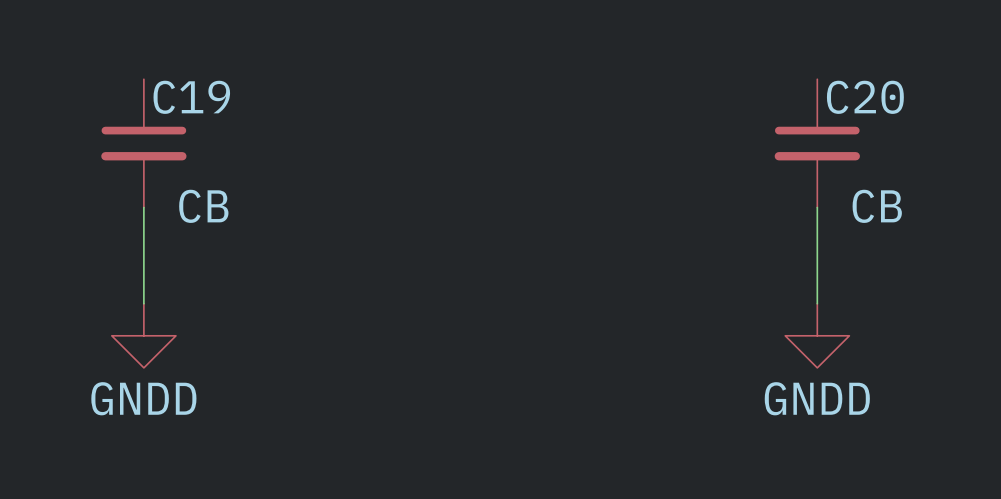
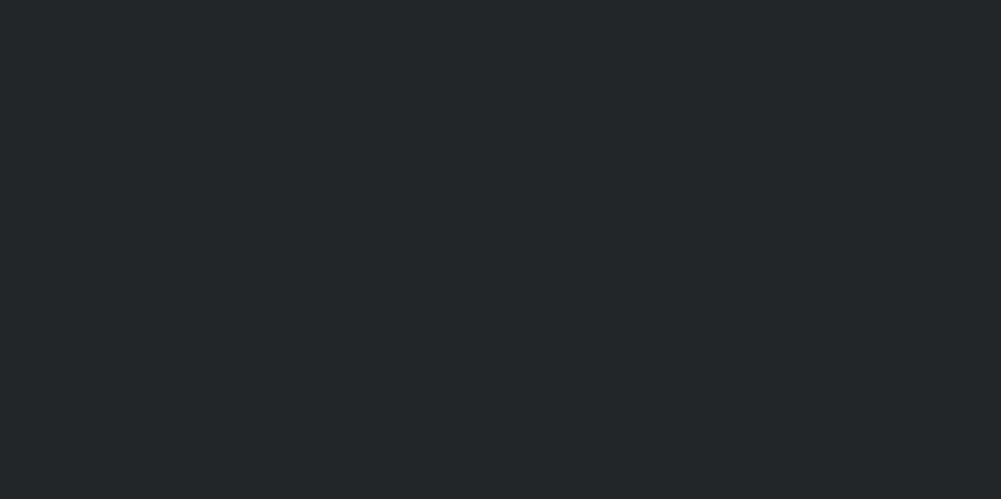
C19: CB (143, 143) -> none
C20: CB (817, 143) -> none
wire: (143, 207) (143, 303) -> none
wire: (817, 207) (817, 303) -> none
power symbol: GNDD (143, 335) -> none
power symbol: GNDD (817, 335) -> none

